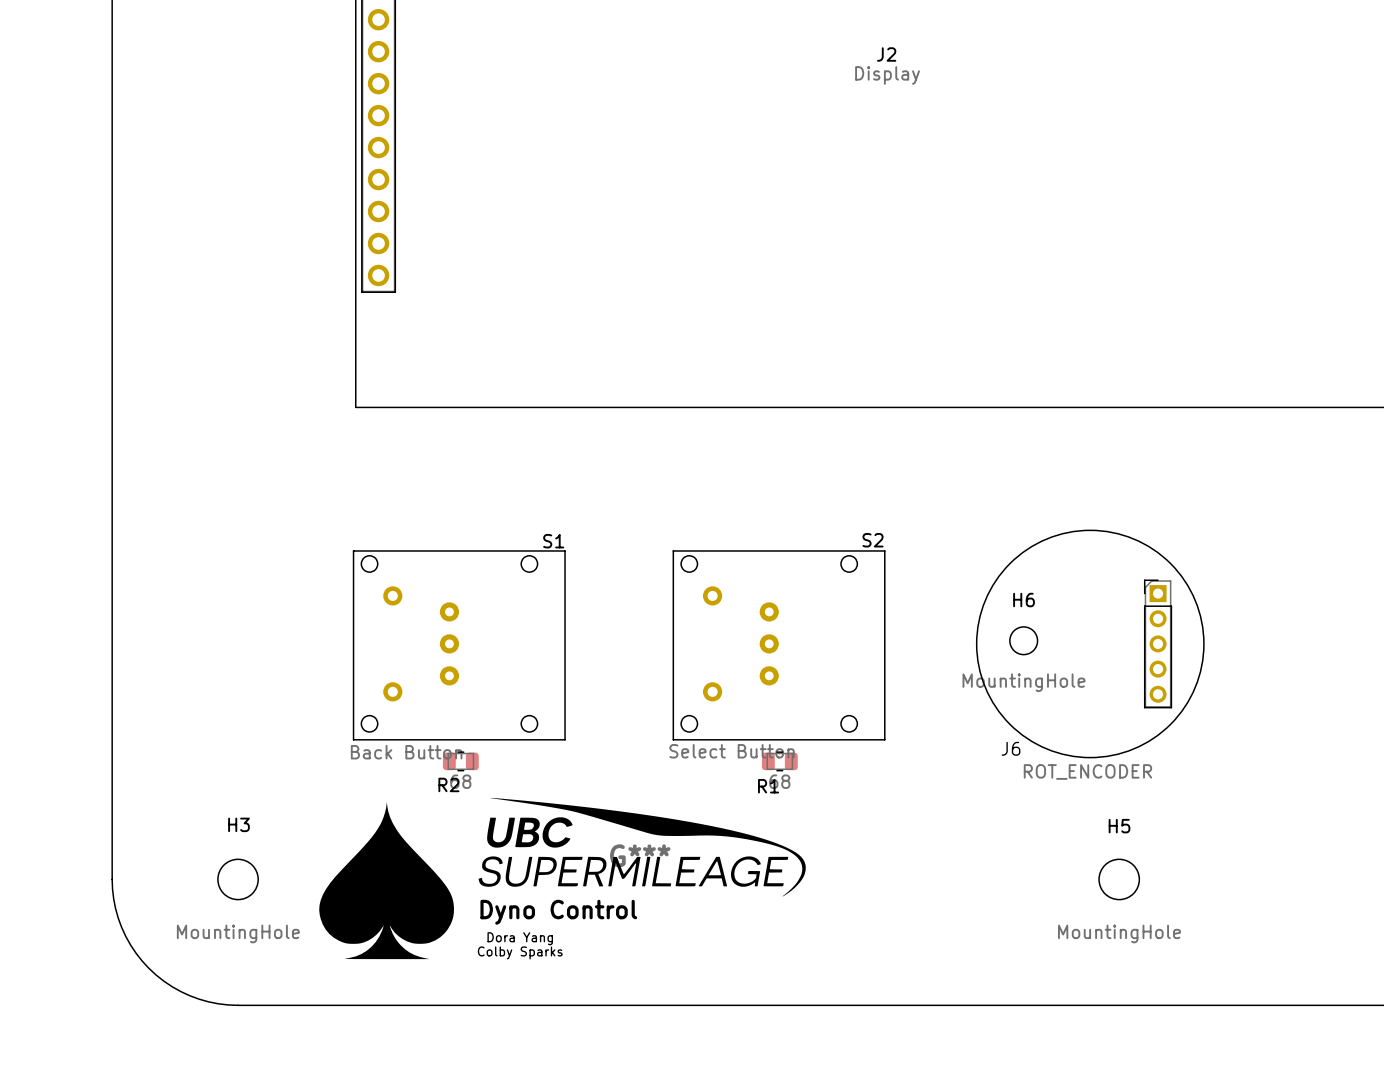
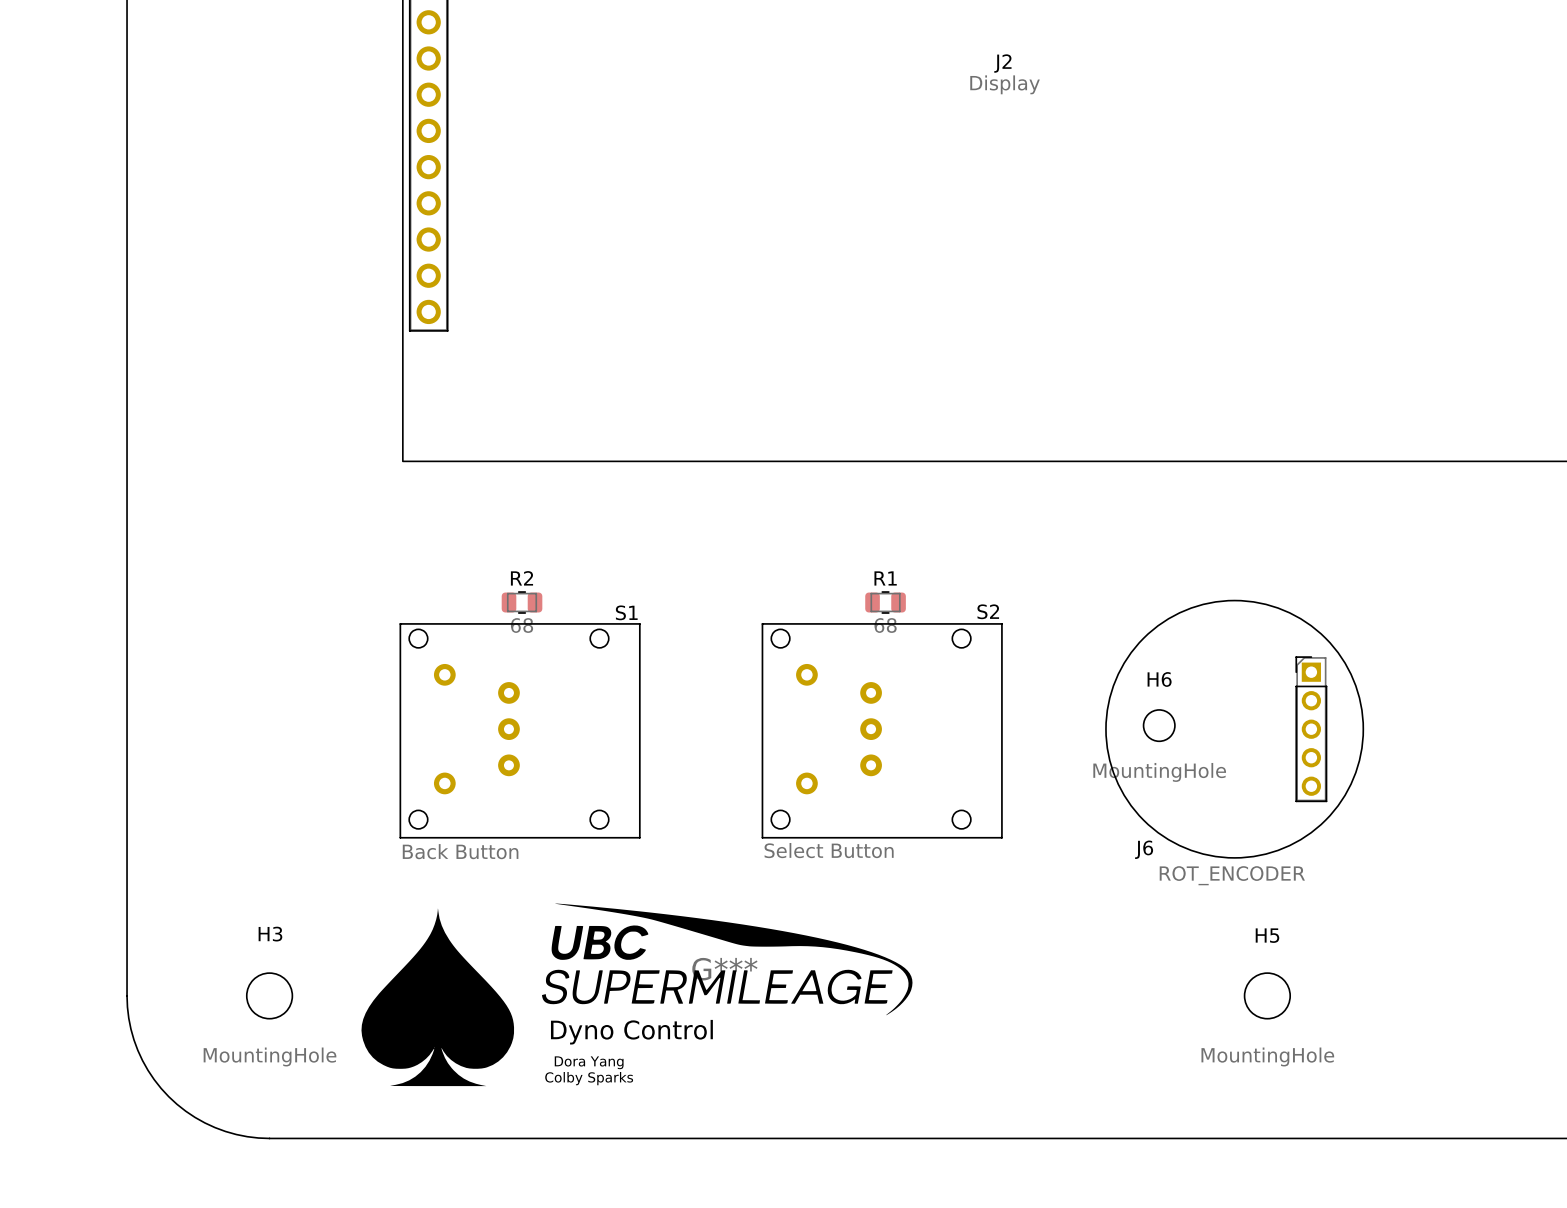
R2 position: (460, 761) -> (522, 602)
R1 position: (779, 761) -> (885, 602)
R2 name position: R2 (448, 784) -> R2 (521, 578)
R1 name position: R1 (768, 786) -> R1 (885, 578)

